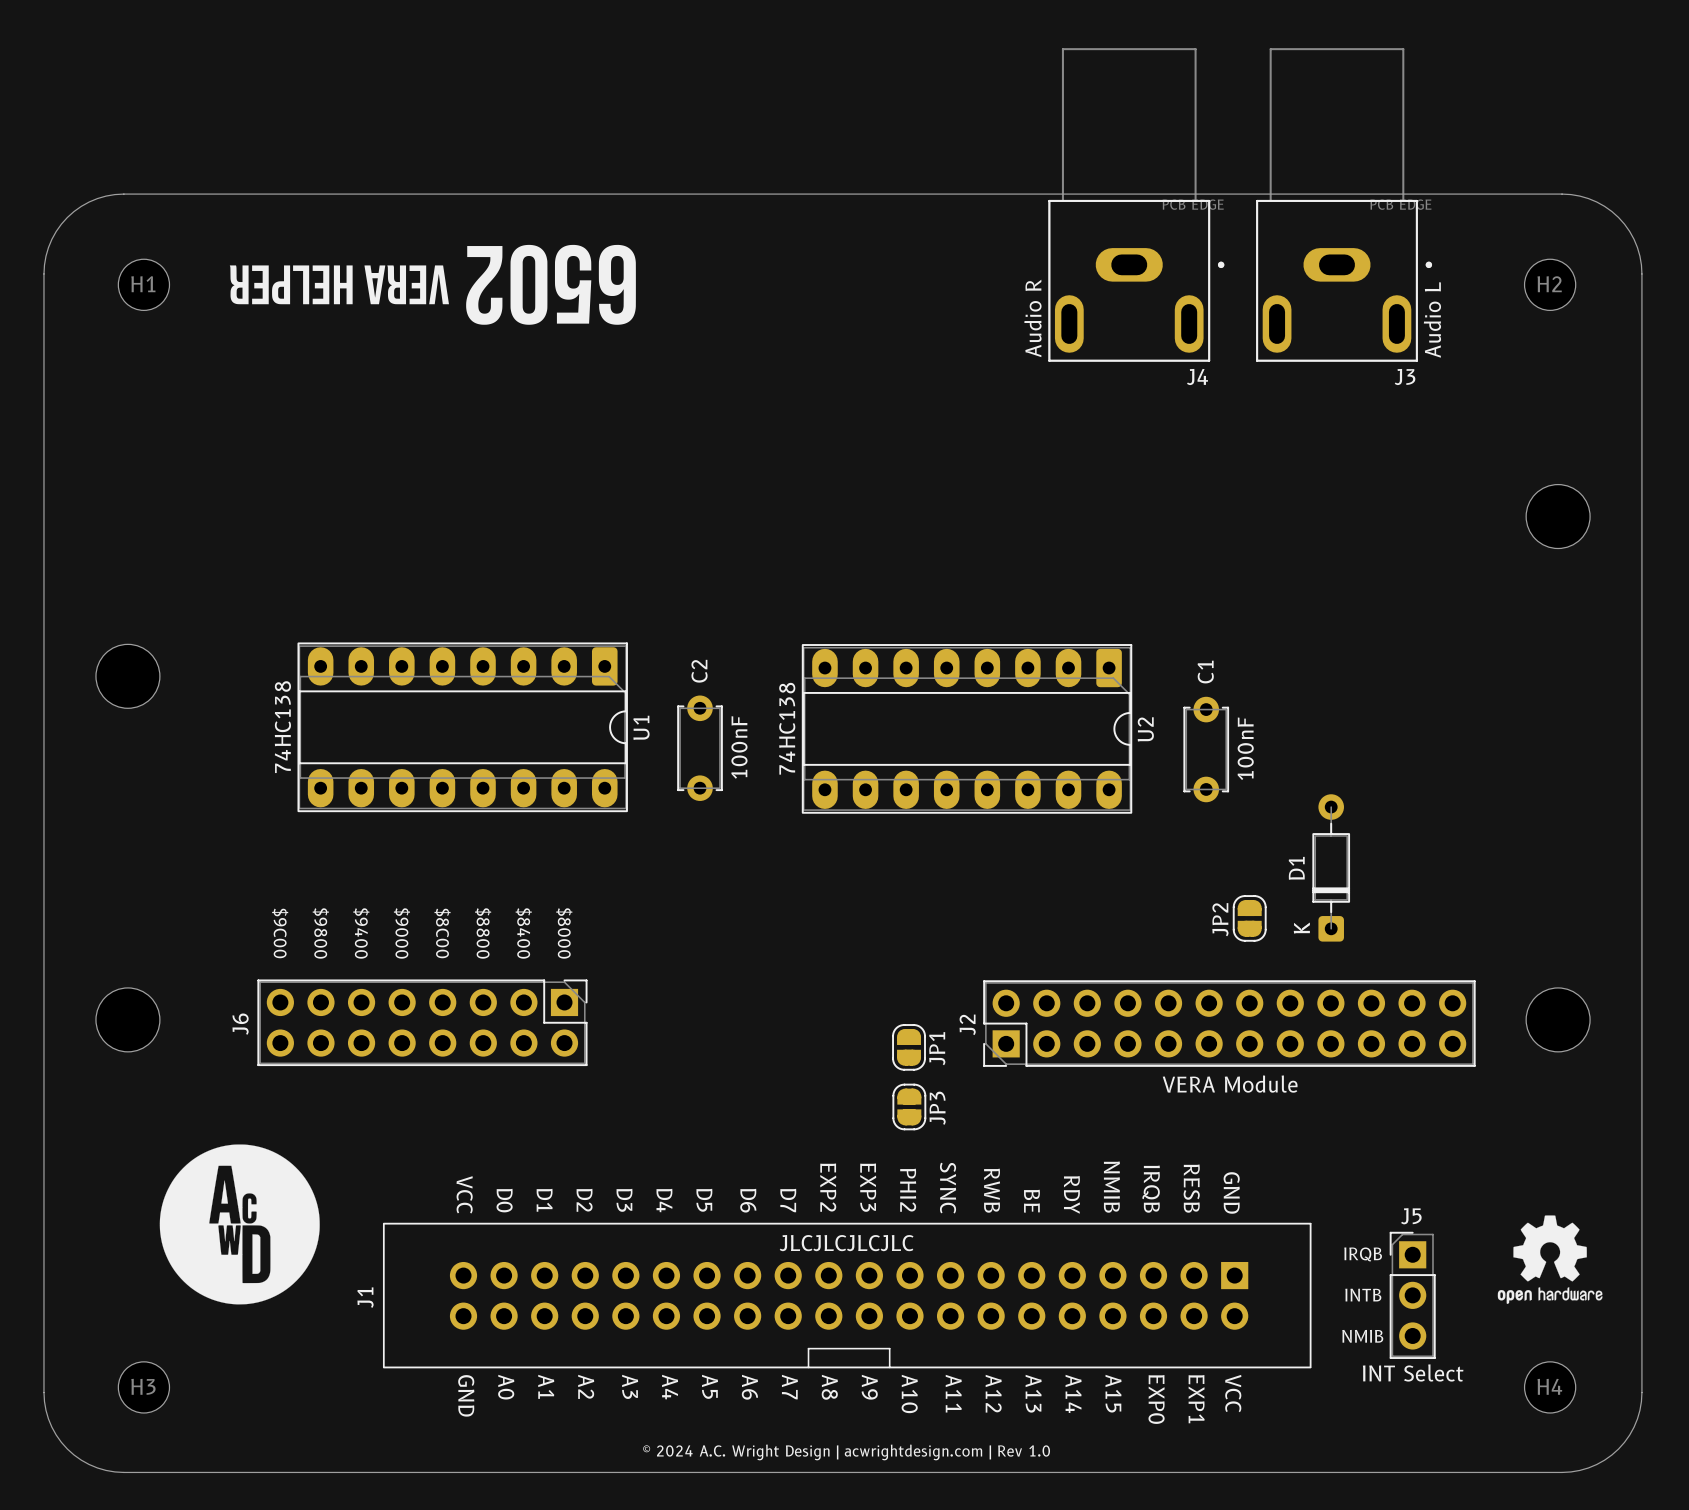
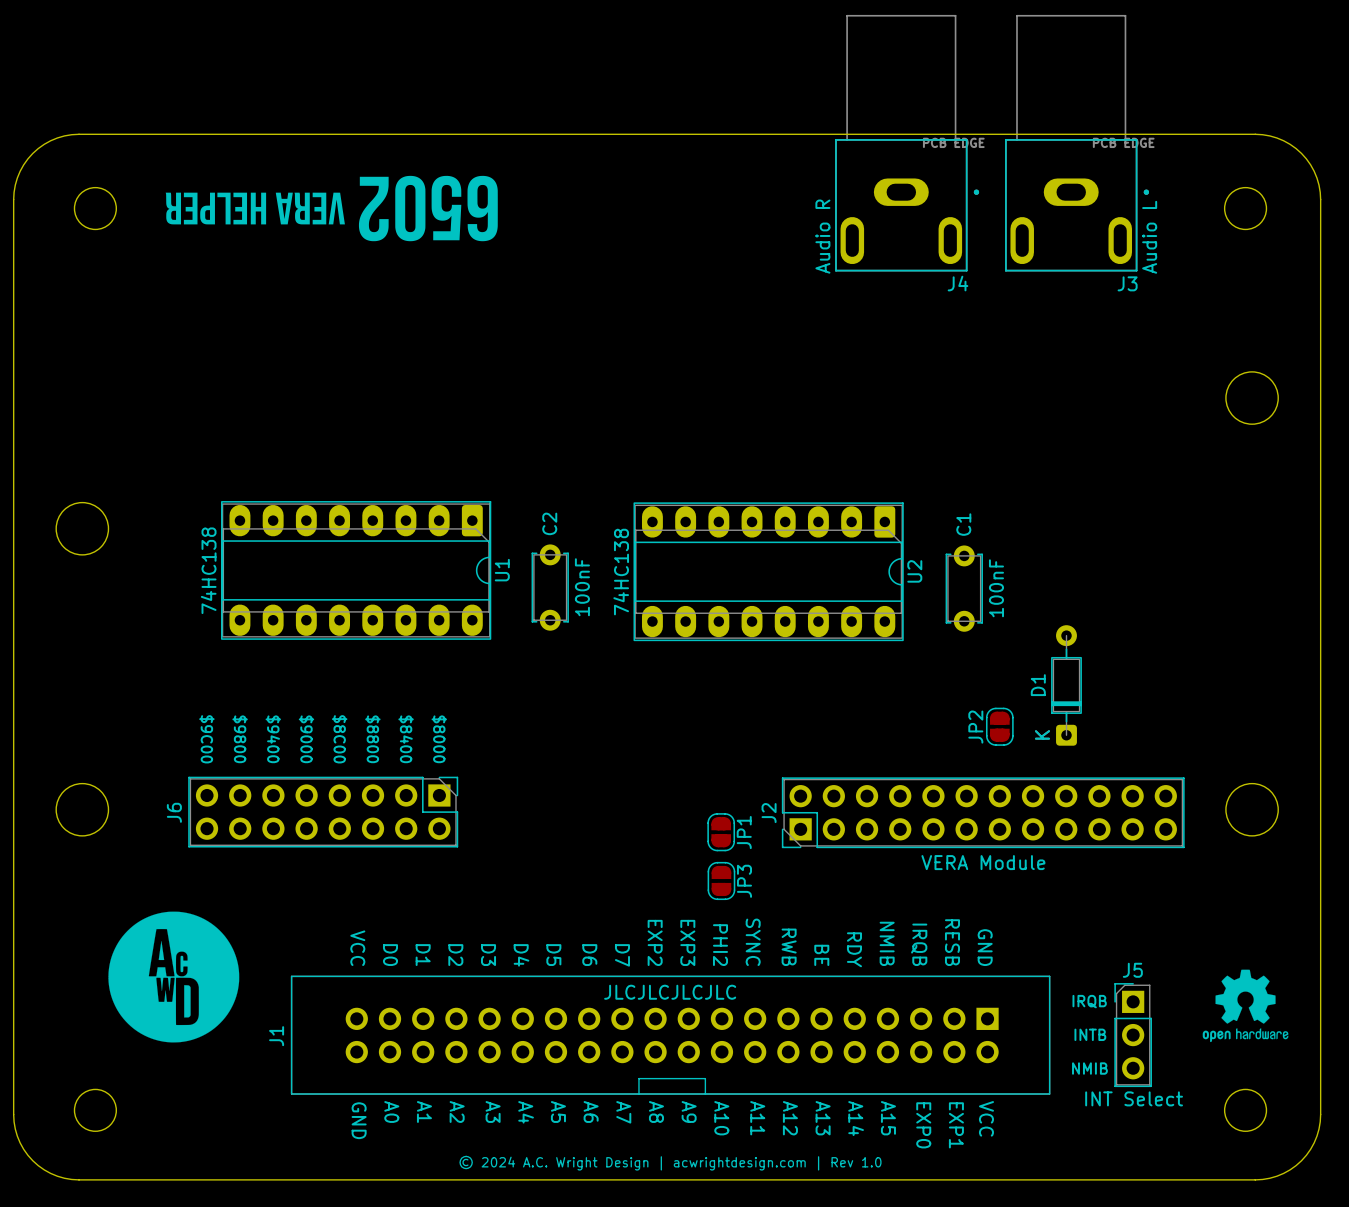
H1 name: H1 (143, 284) -> none
H2 name: H2 (1549, 284) -> none
H3 name: H3 (143, 1386) -> none
H4 name: H4 (1549, 1386) -> none

